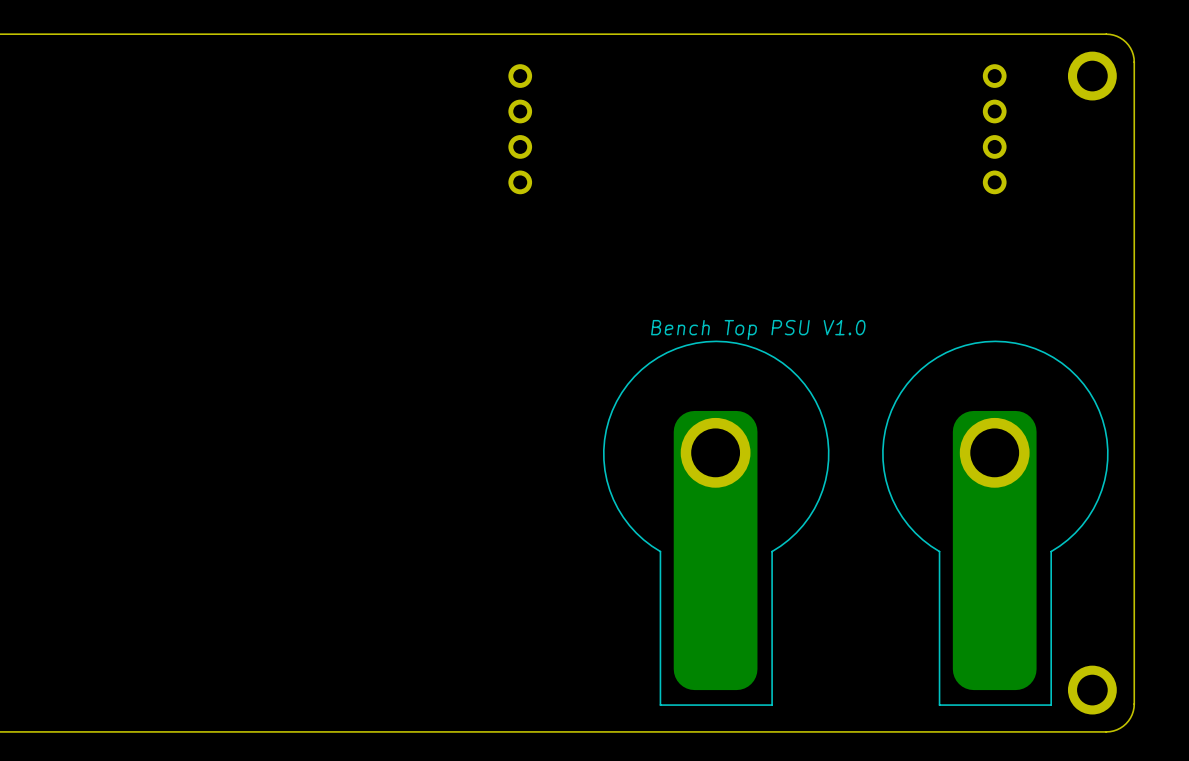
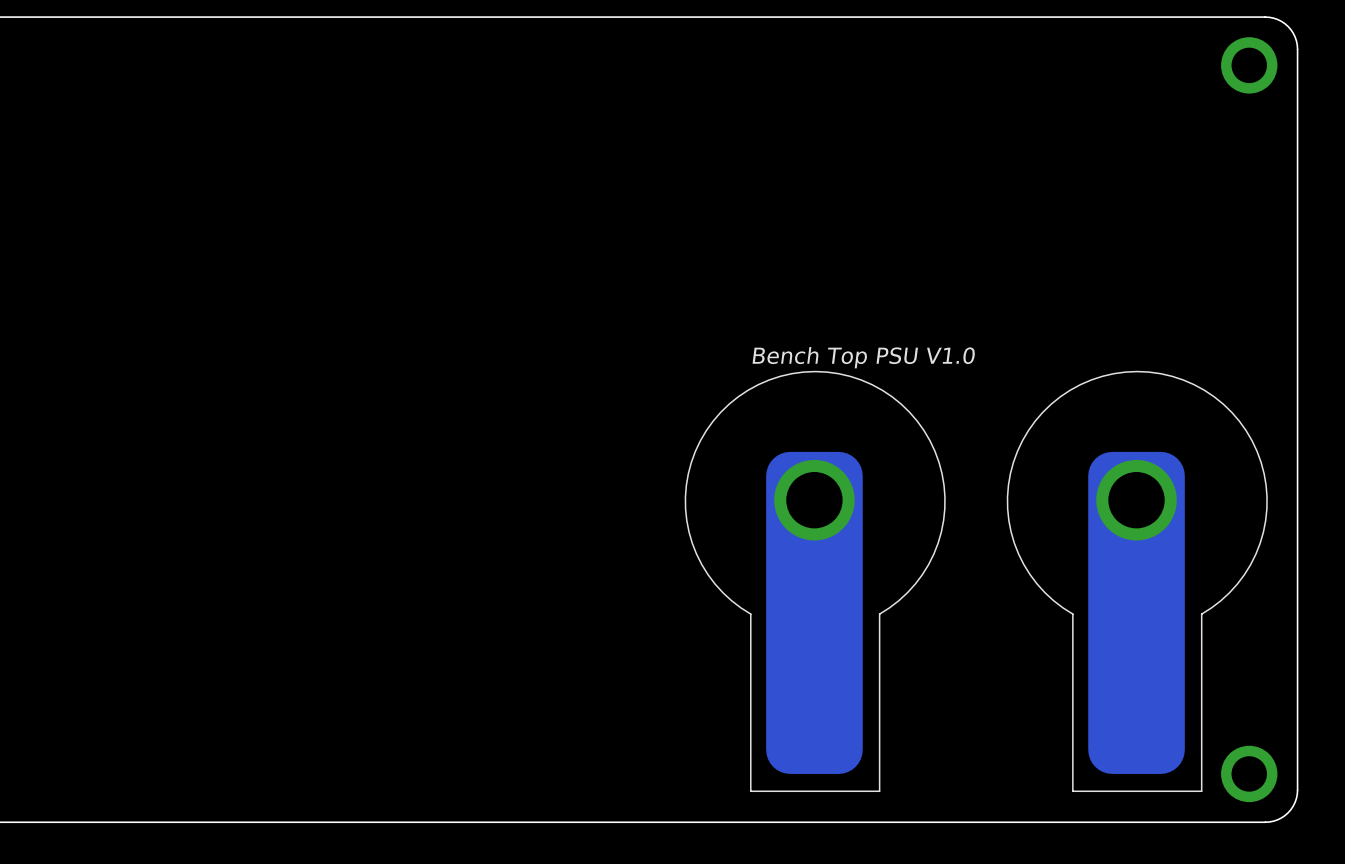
part: (520, 129) -> none
part: (994, 129) -> none

